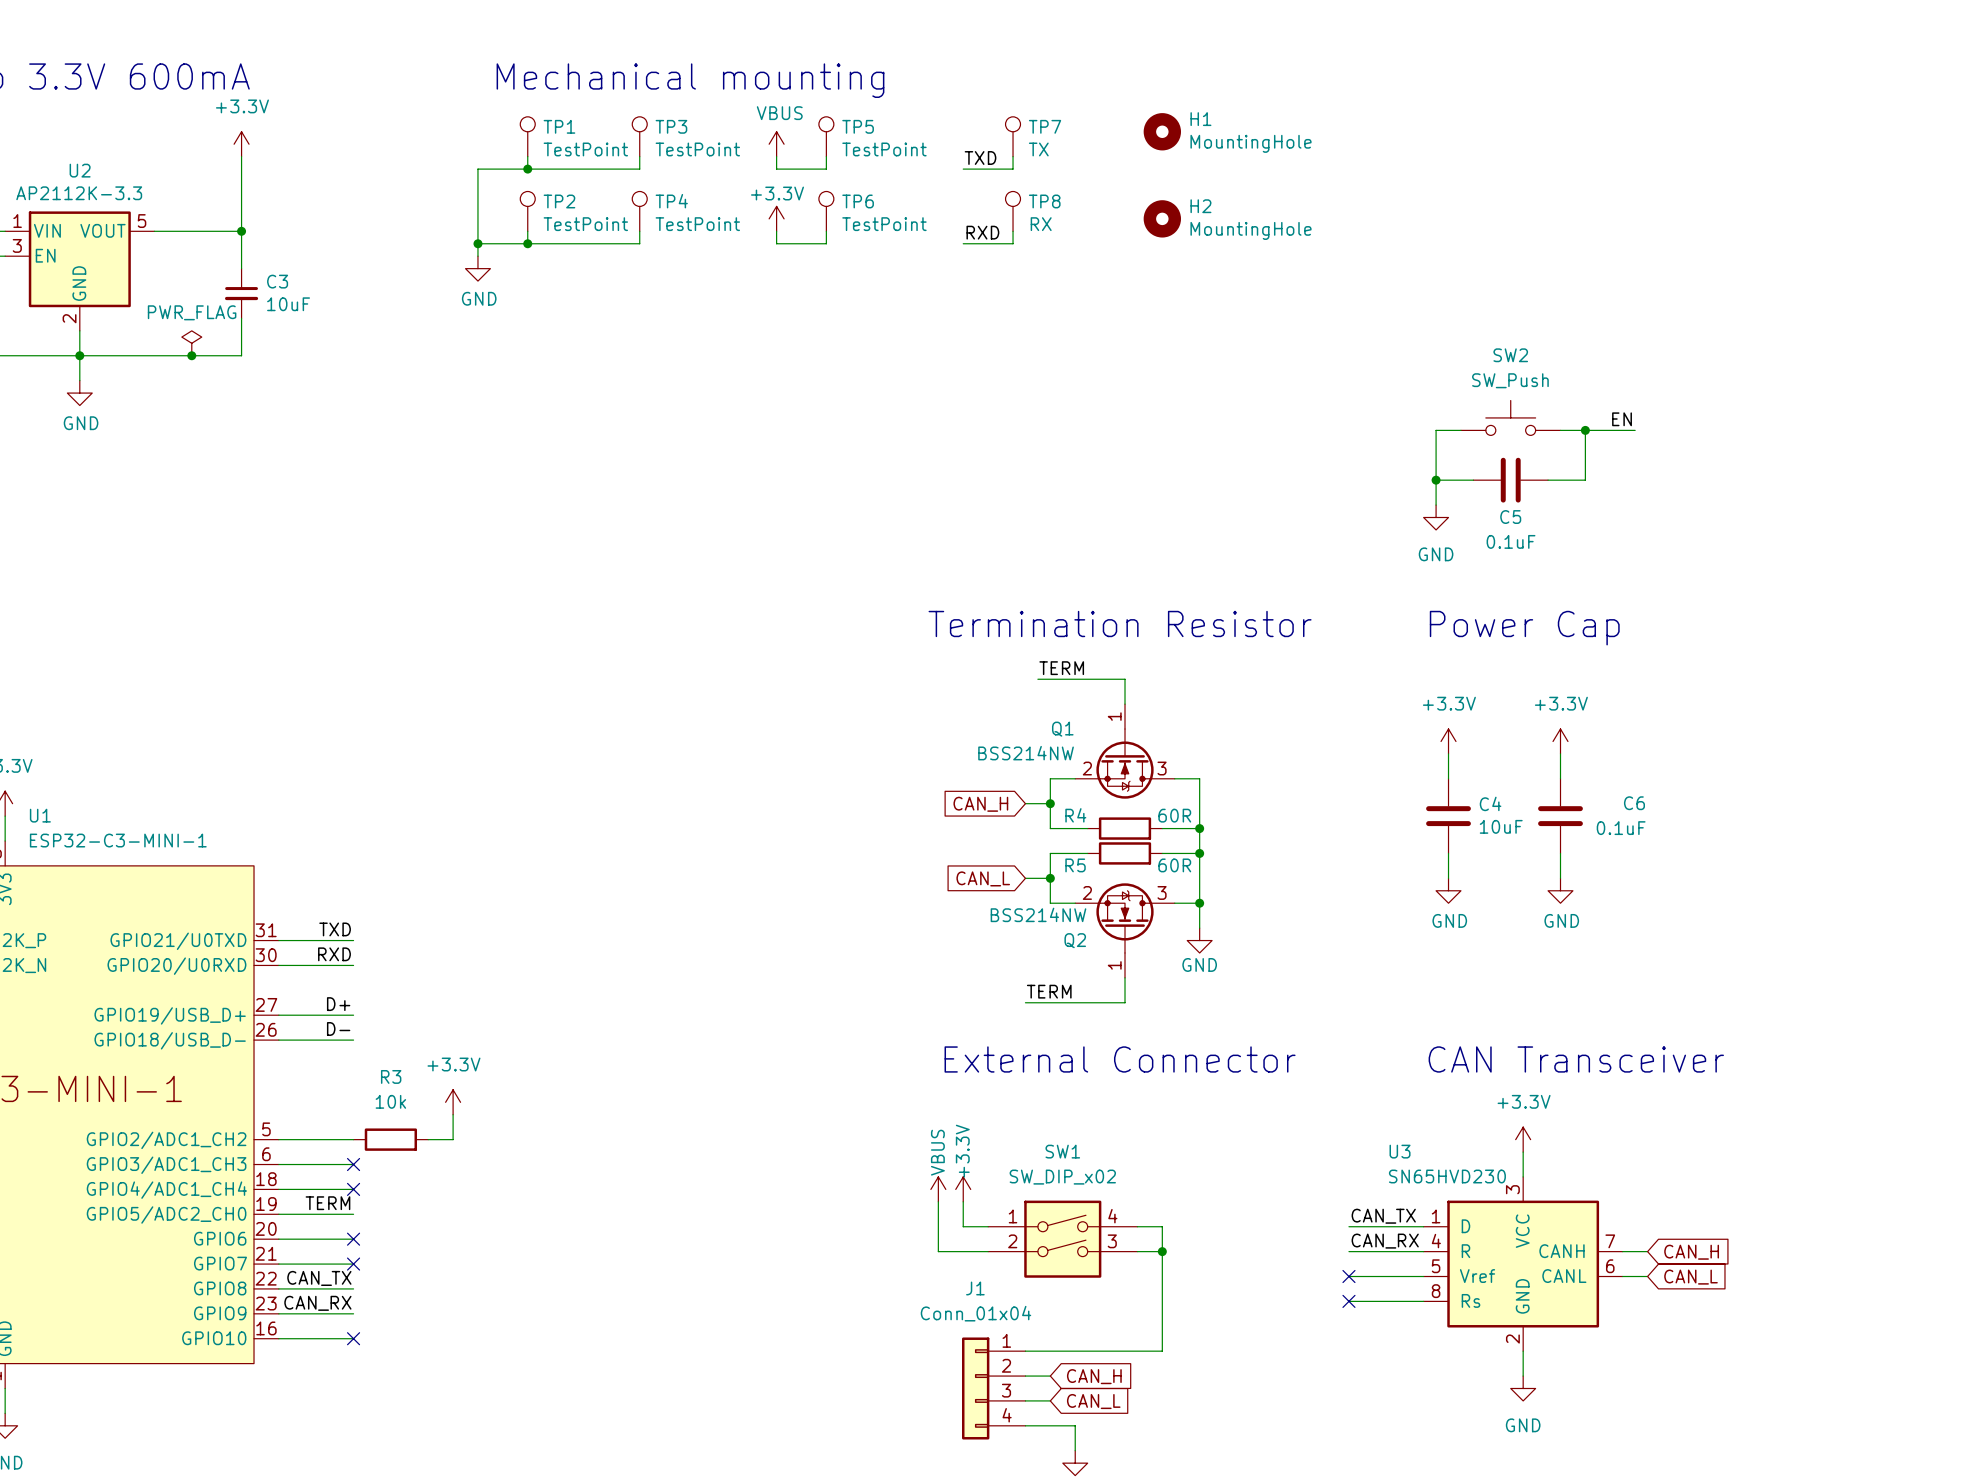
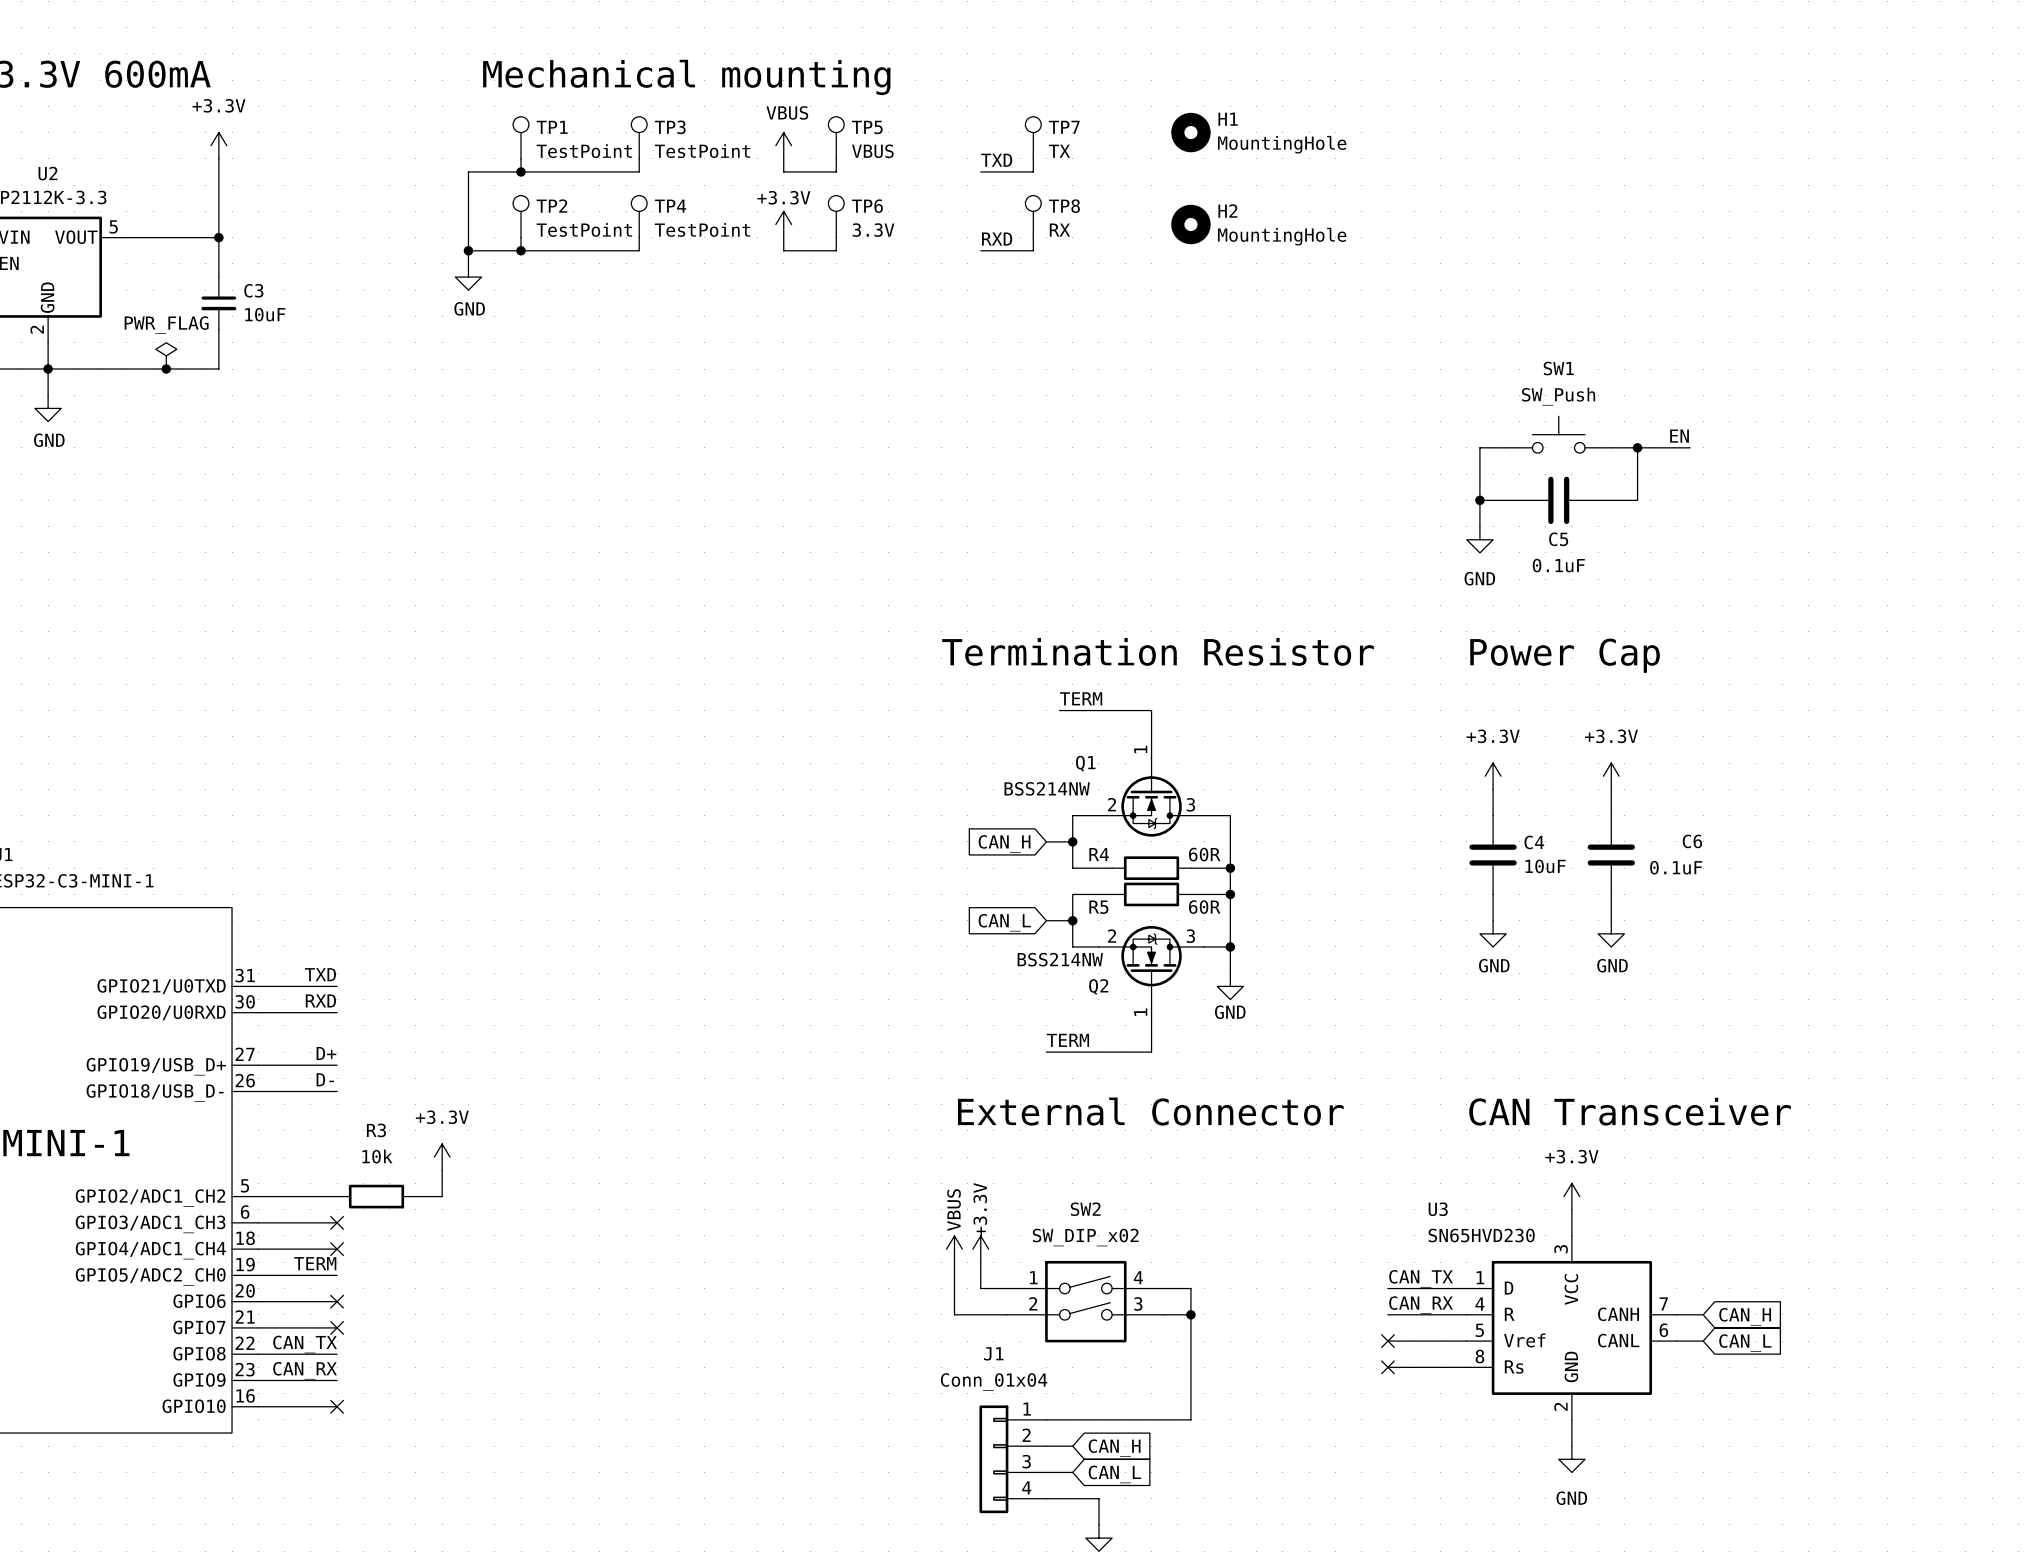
TP5 value: TestPoint (884, 149) -> VBUS (872, 151)
TP6 value: TestPoint (884, 224) -> 3.3V (873, 230)
SW2 name: SW2 (1510, 355) -> SW1 (1558, 368)
SW1 name: SW1 (1062, 1151) -> SW2 (1085, 1209)

